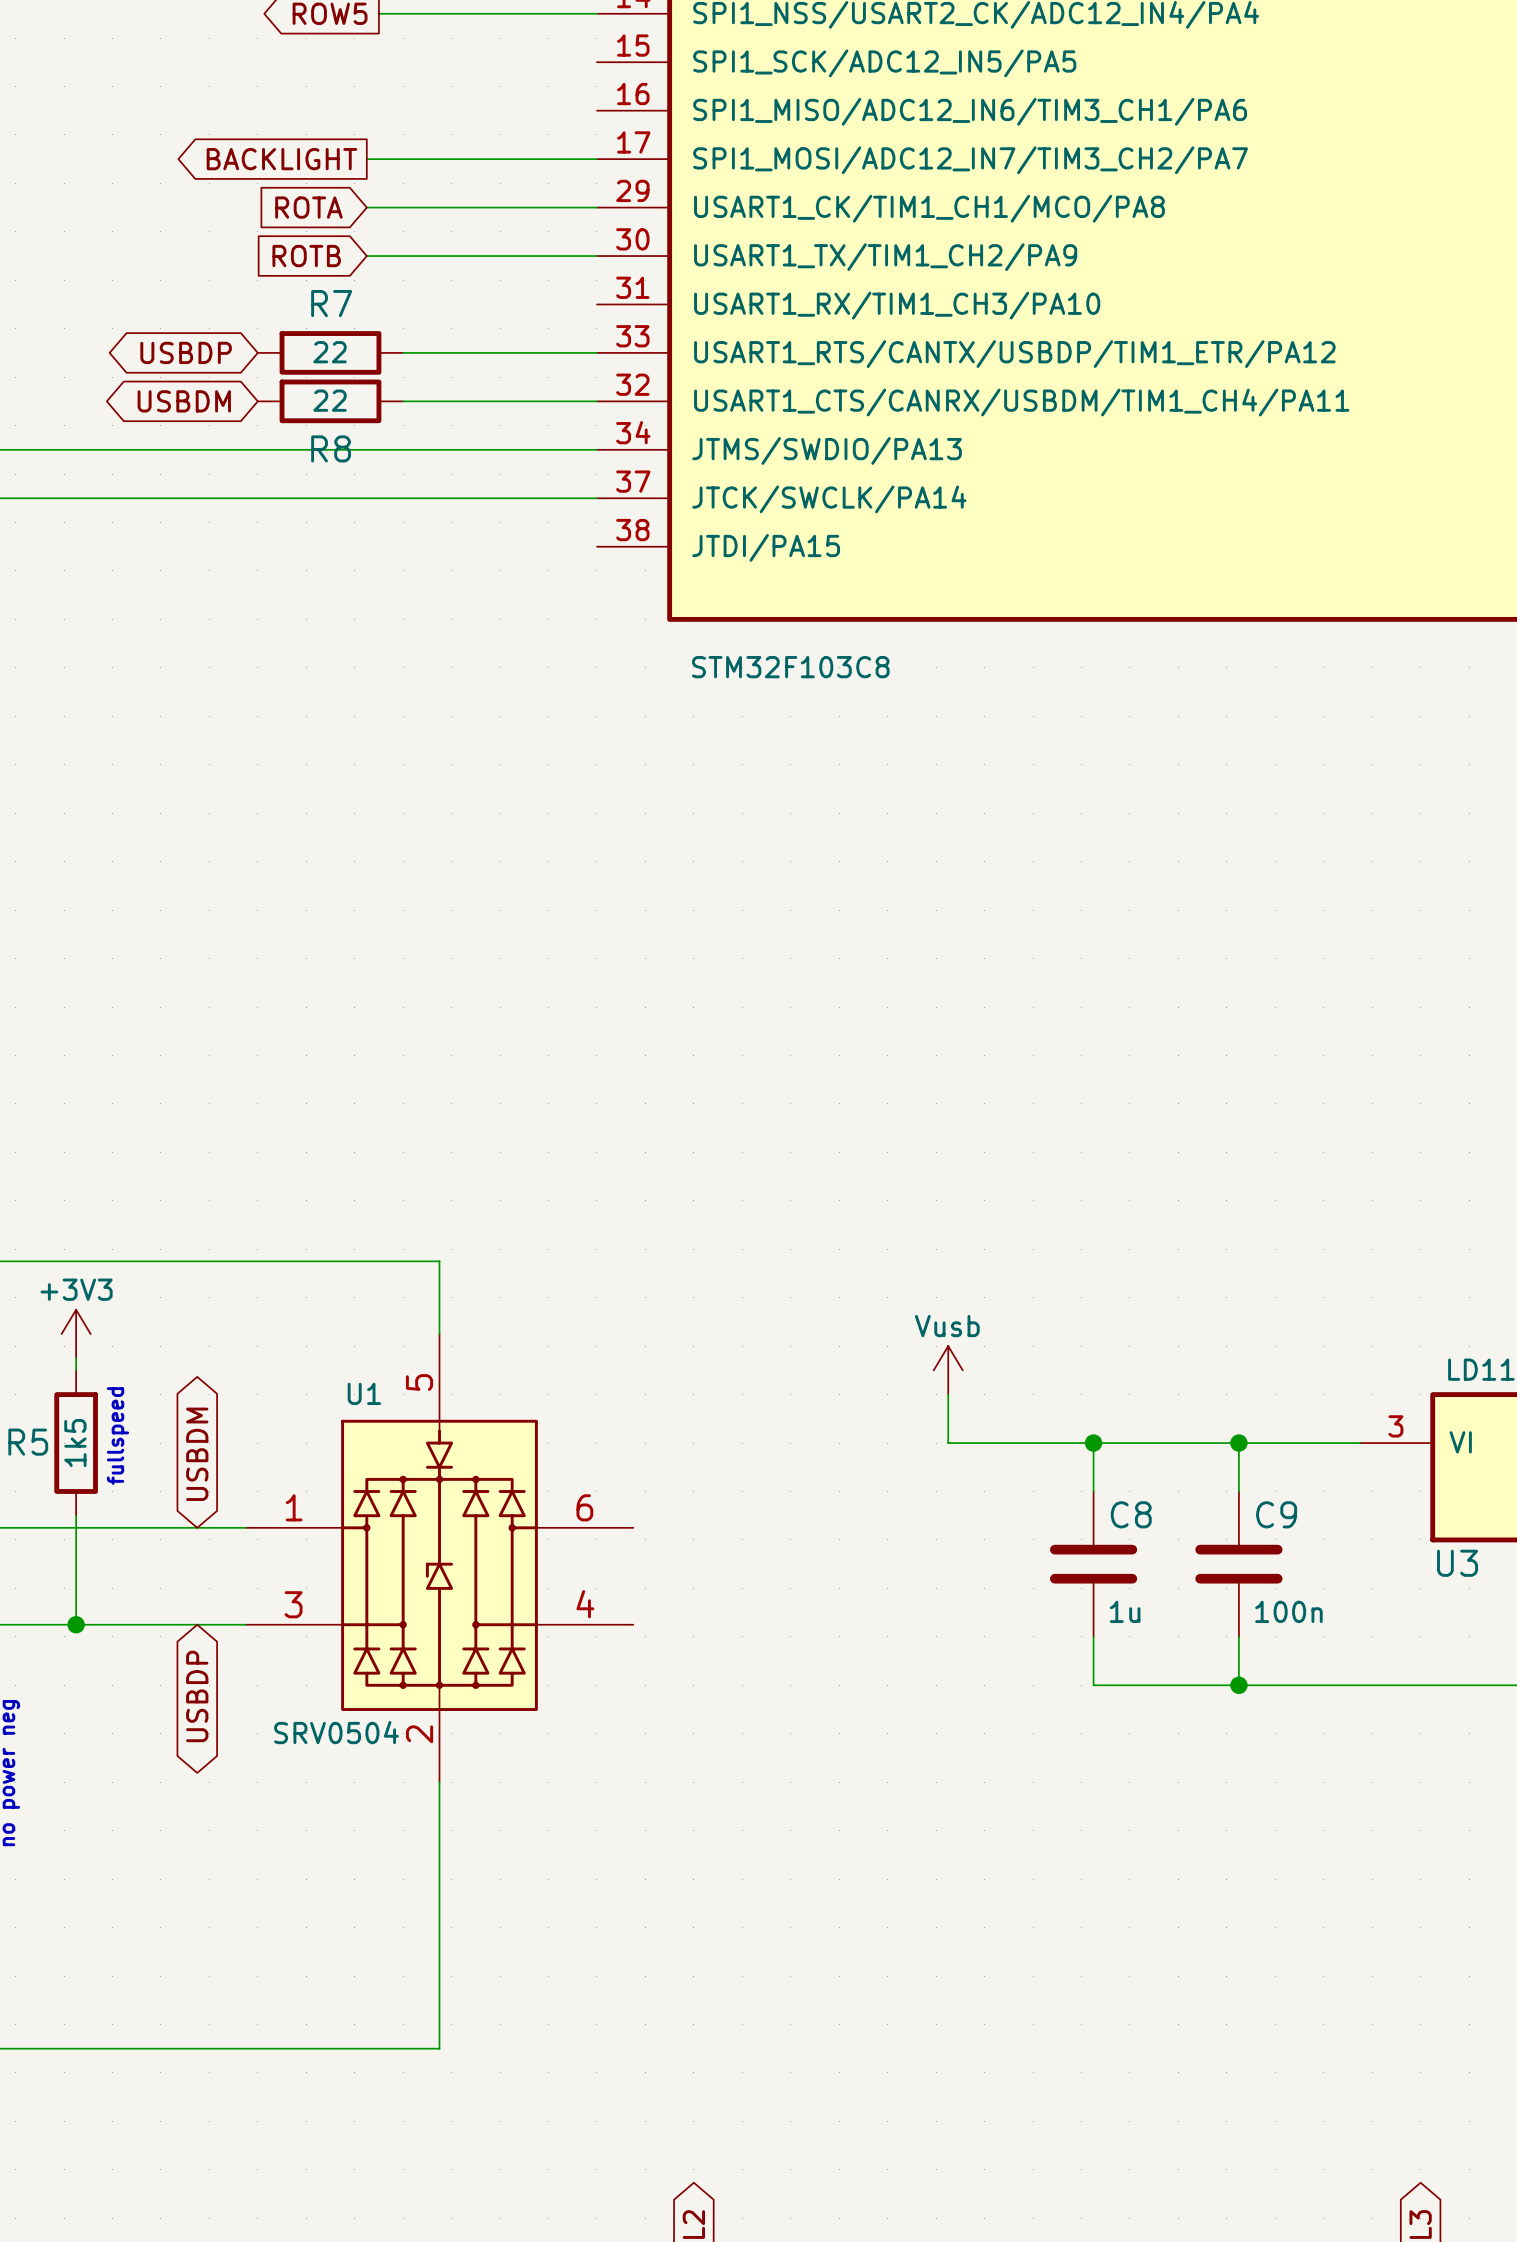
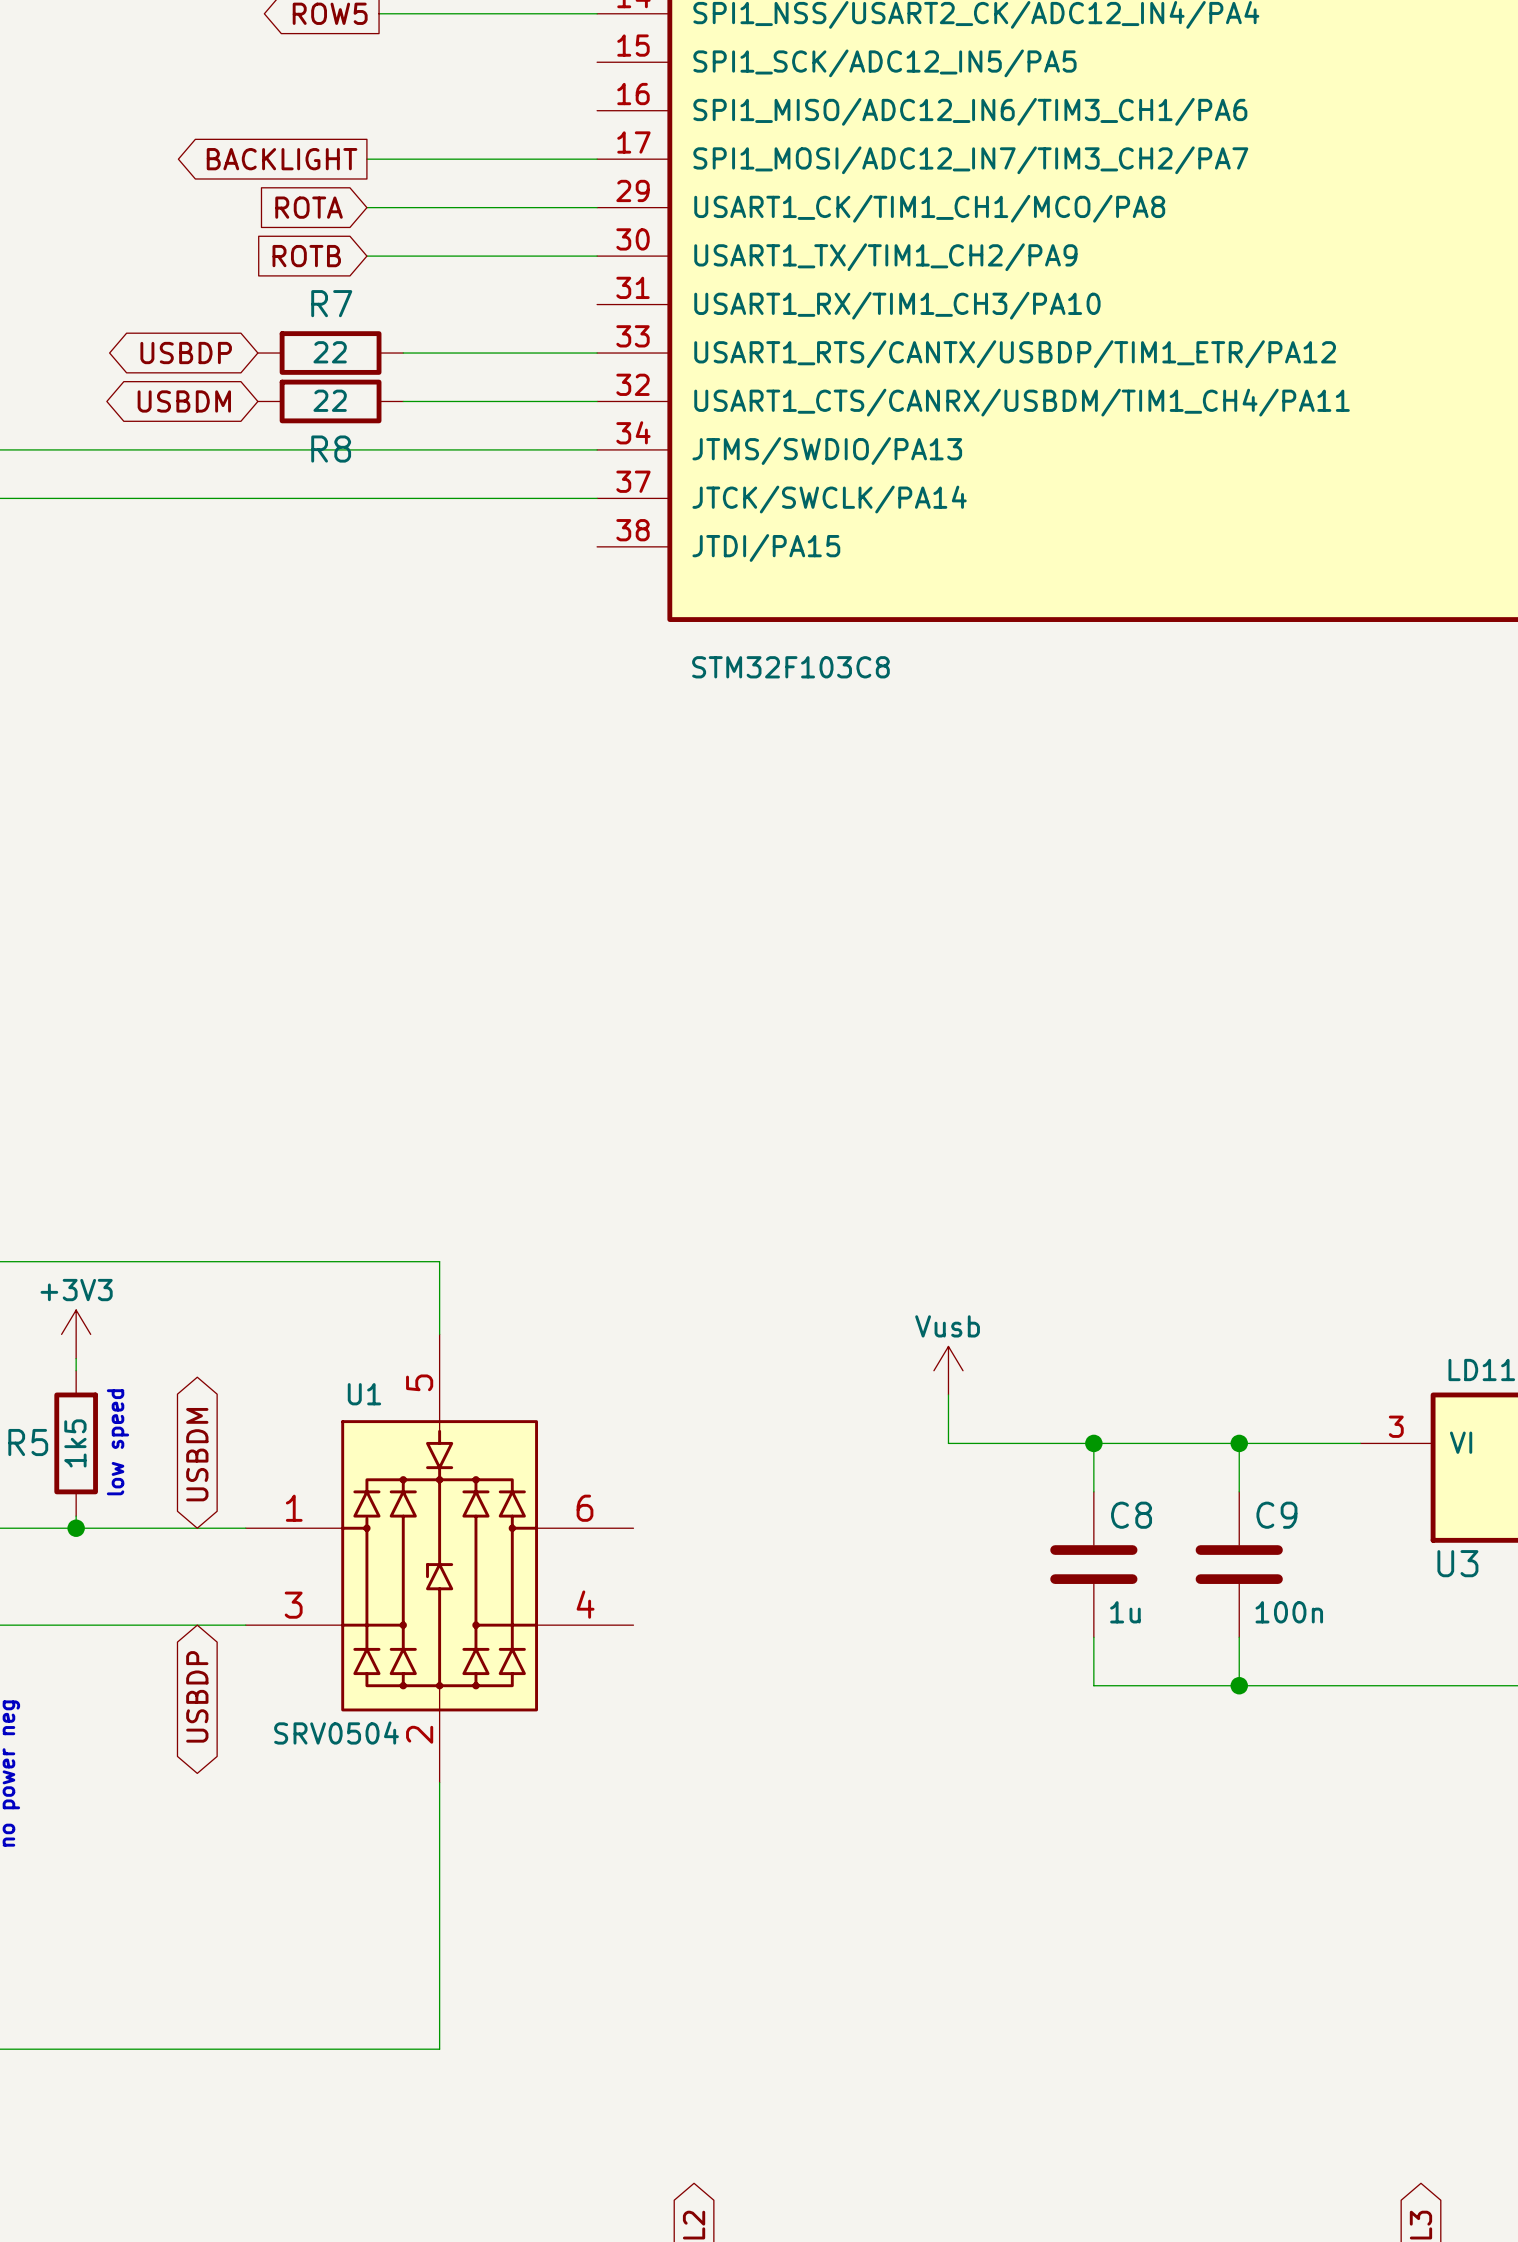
text: fullspeed (117, 1436) -> low speed (117, 1442)
wire: (76, 1527) (76, 1624) -> none
junction position: (76, 1624) -> (76, 1528)

